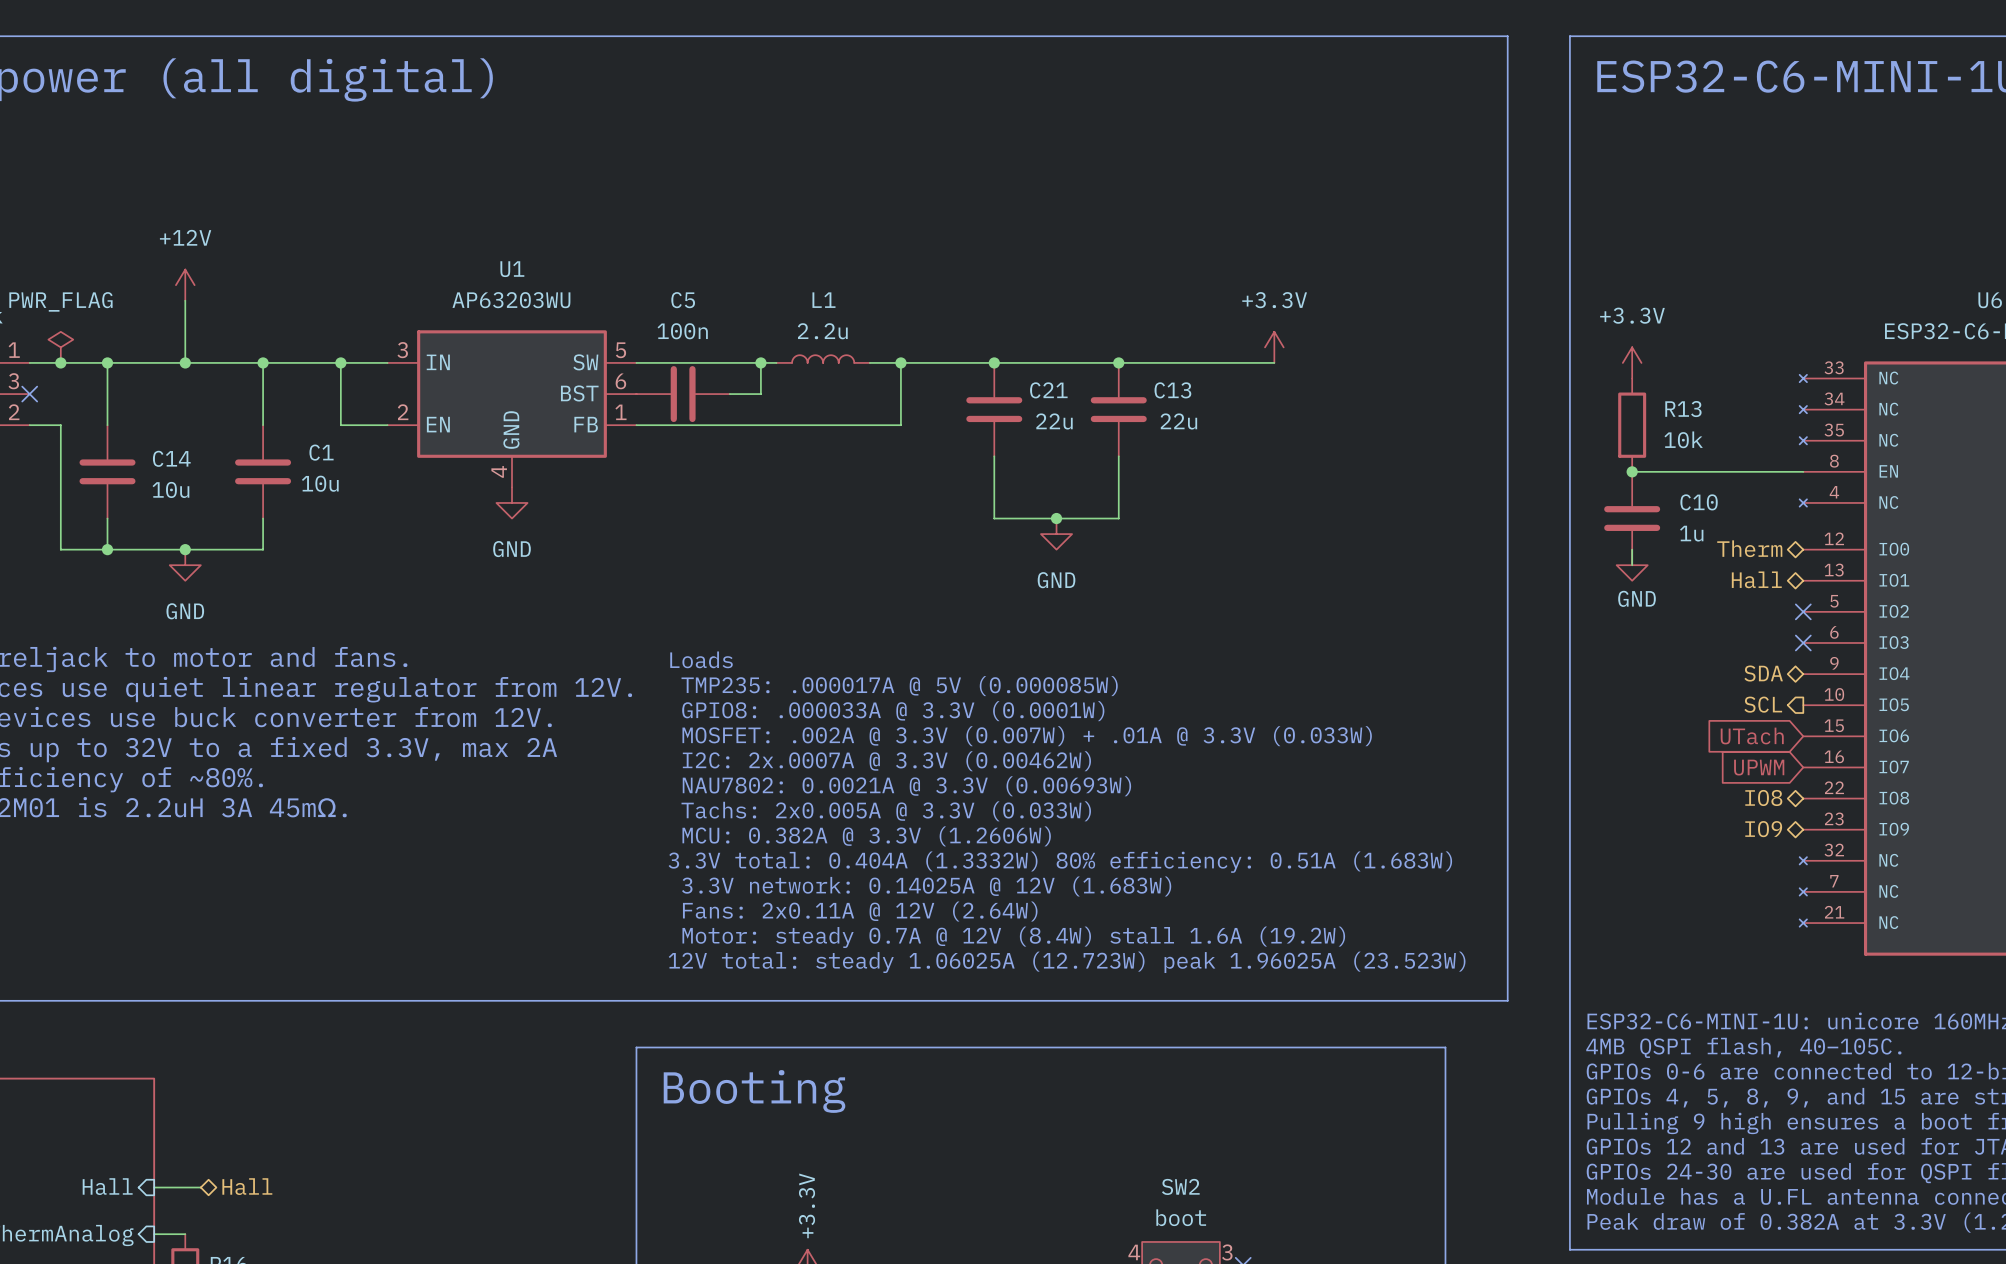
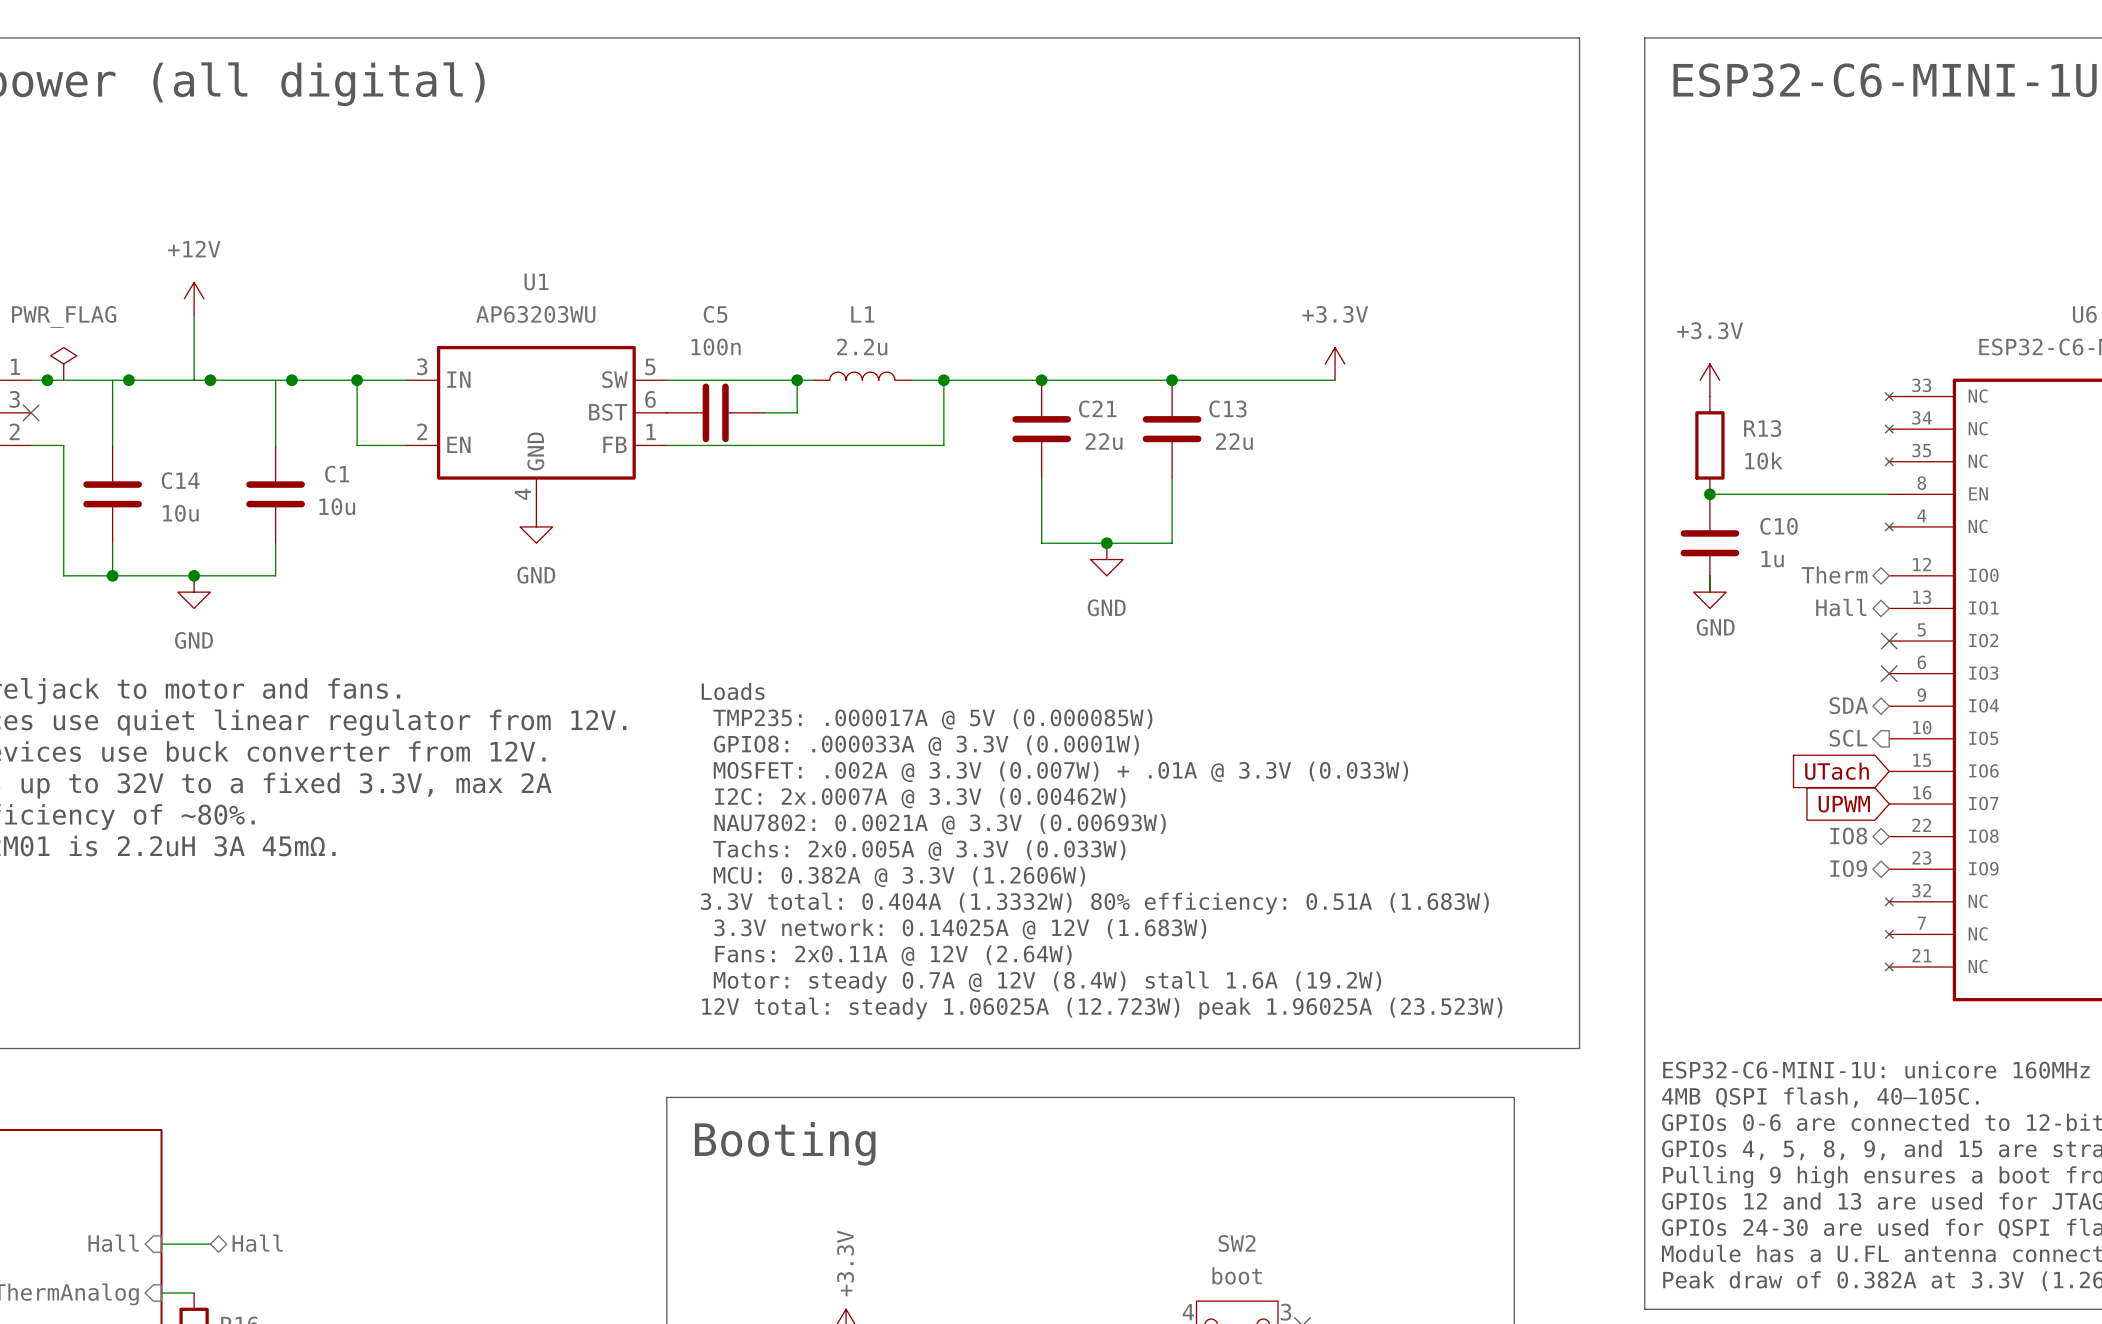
junction position: (60, 362) -> (47, 380)
junction position: (107, 362) -> (128, 380)
junction position: (185, 362) -> (210, 380)
junction position: (263, 362) -> (291, 380)

